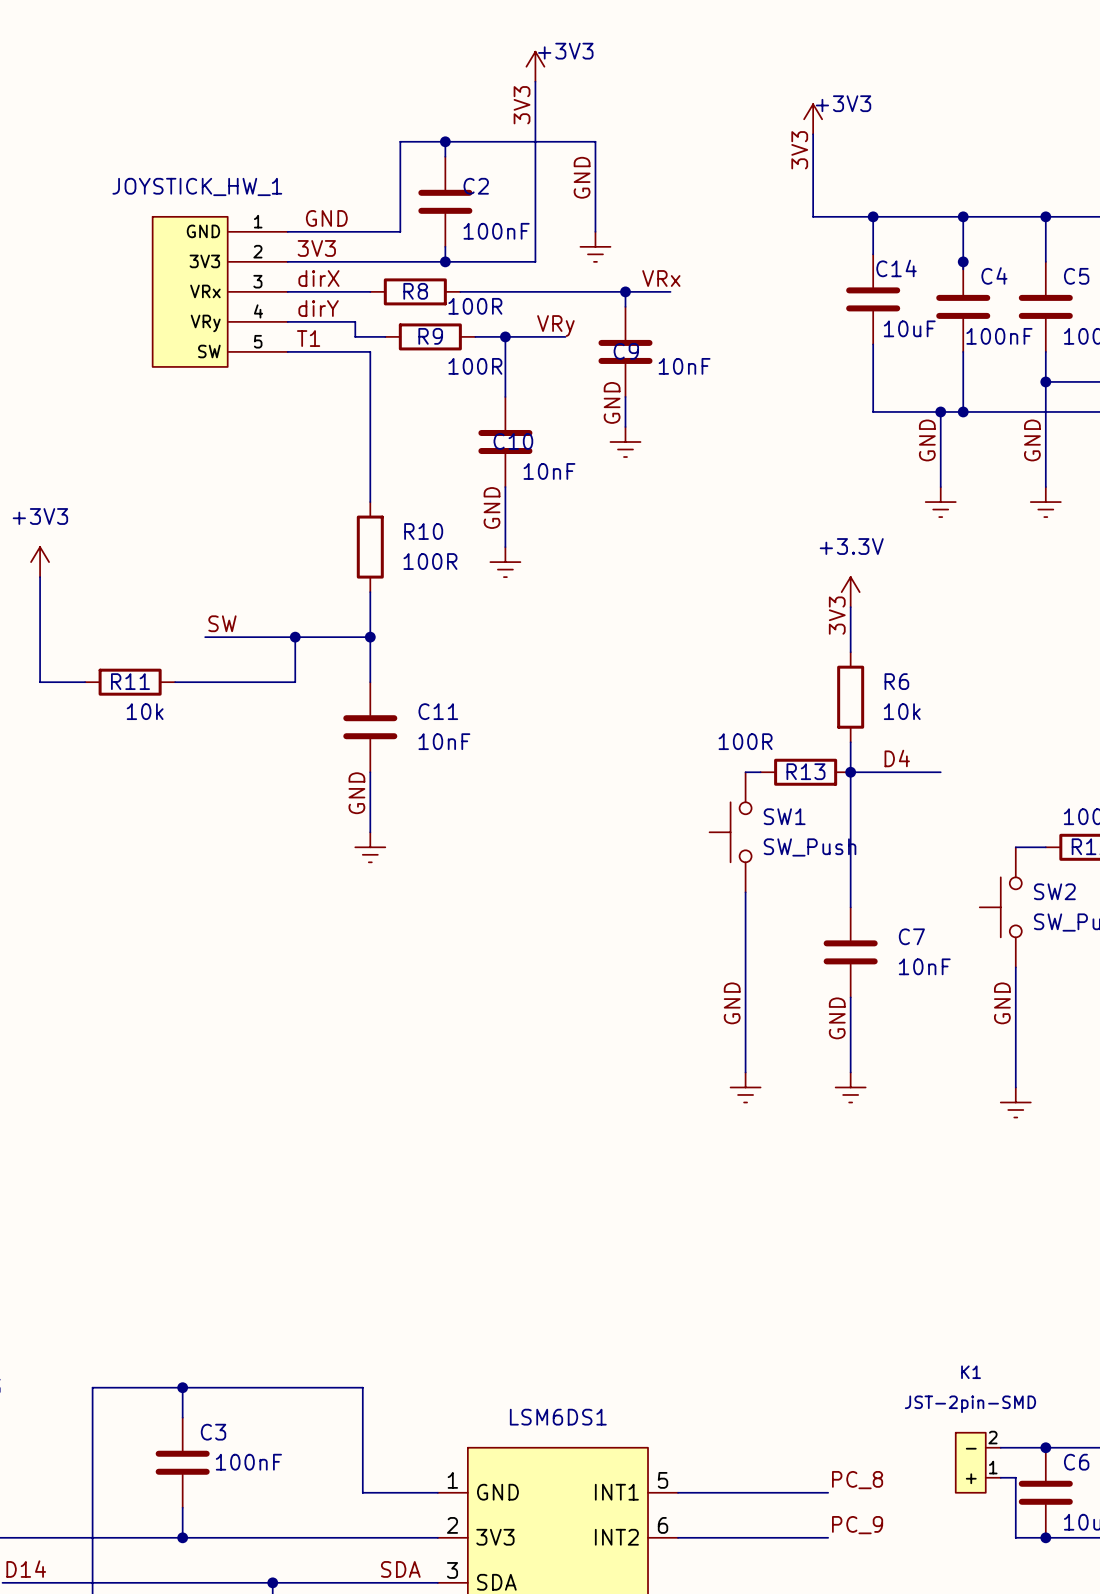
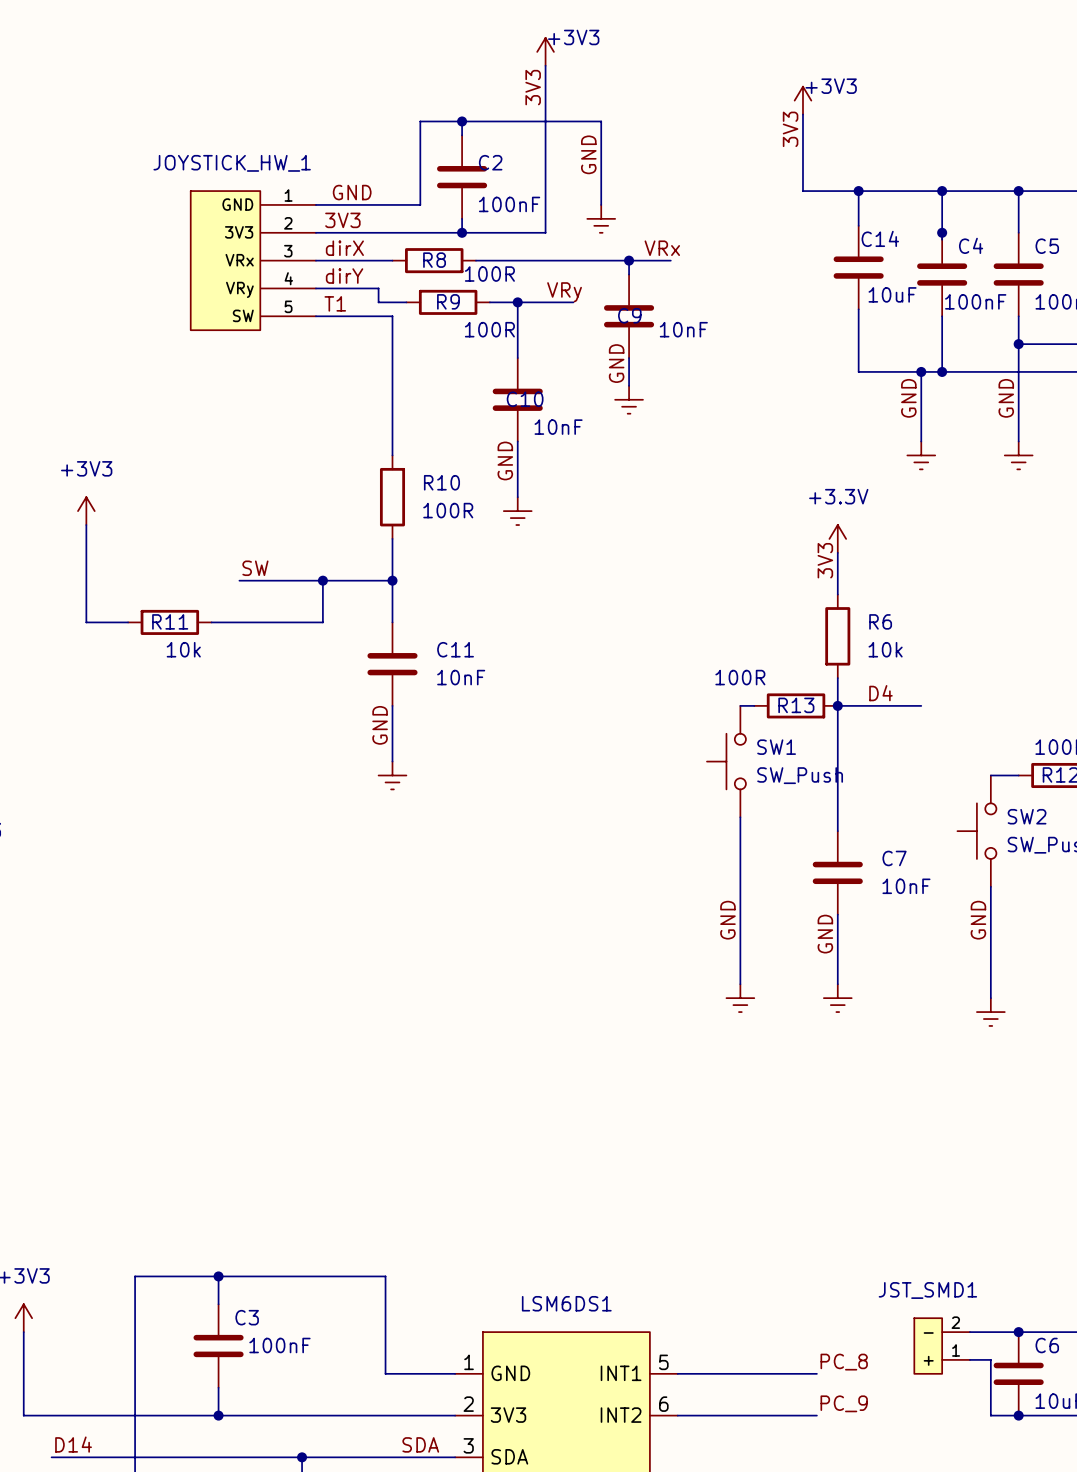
JST_SMD1: none -> (942, 1346)
K1: JST-2pin-SMD (978, 1462) -> none

